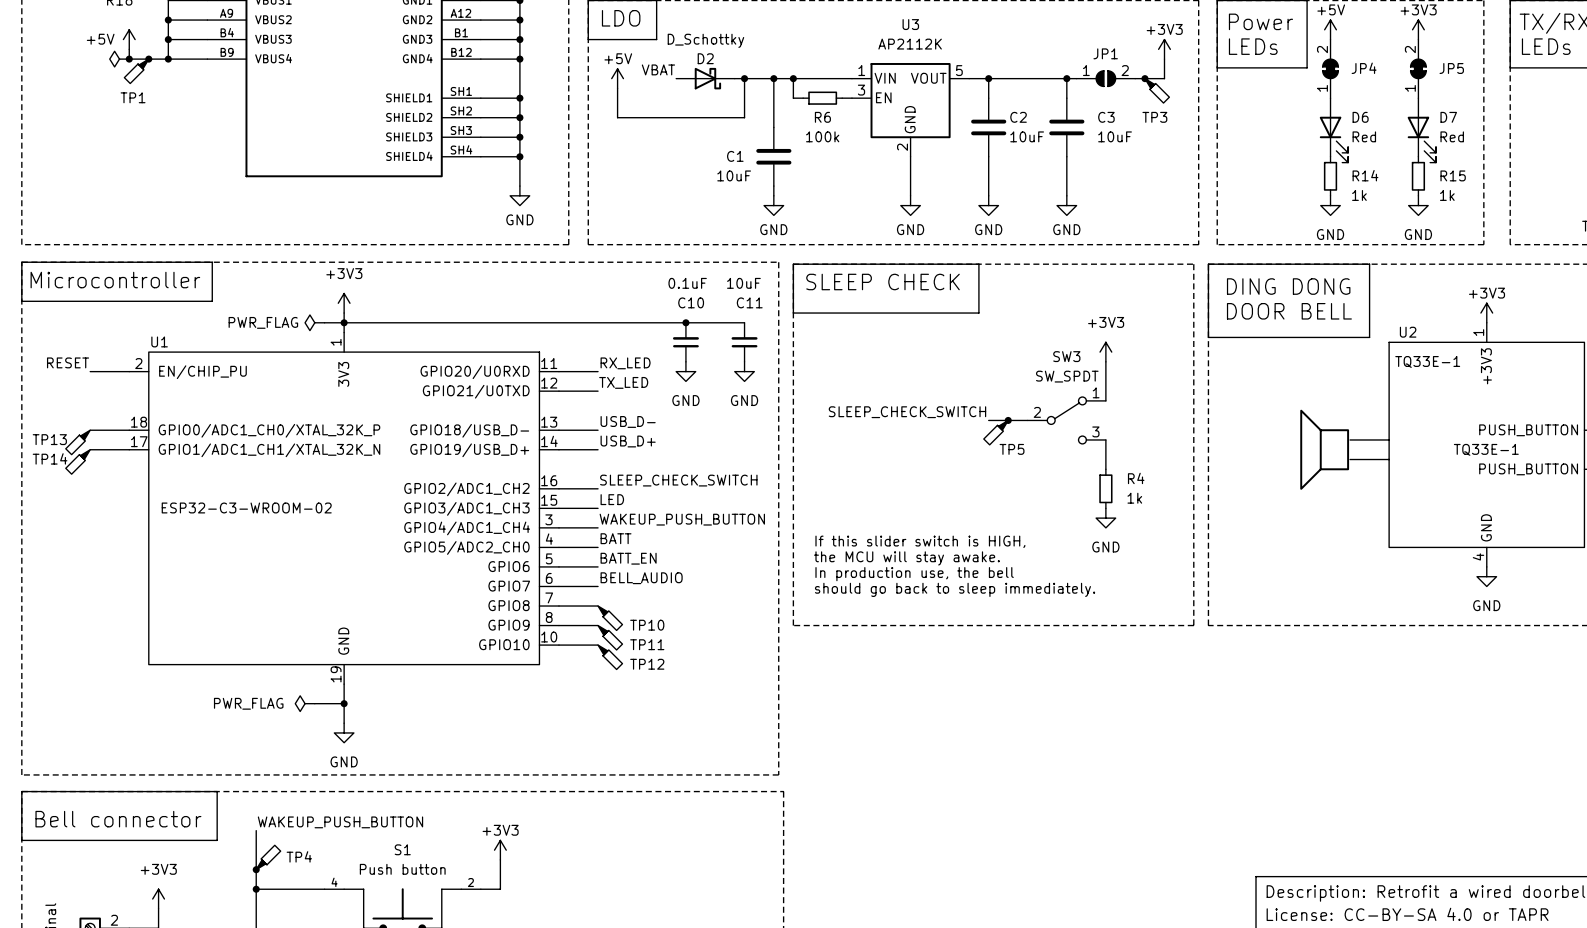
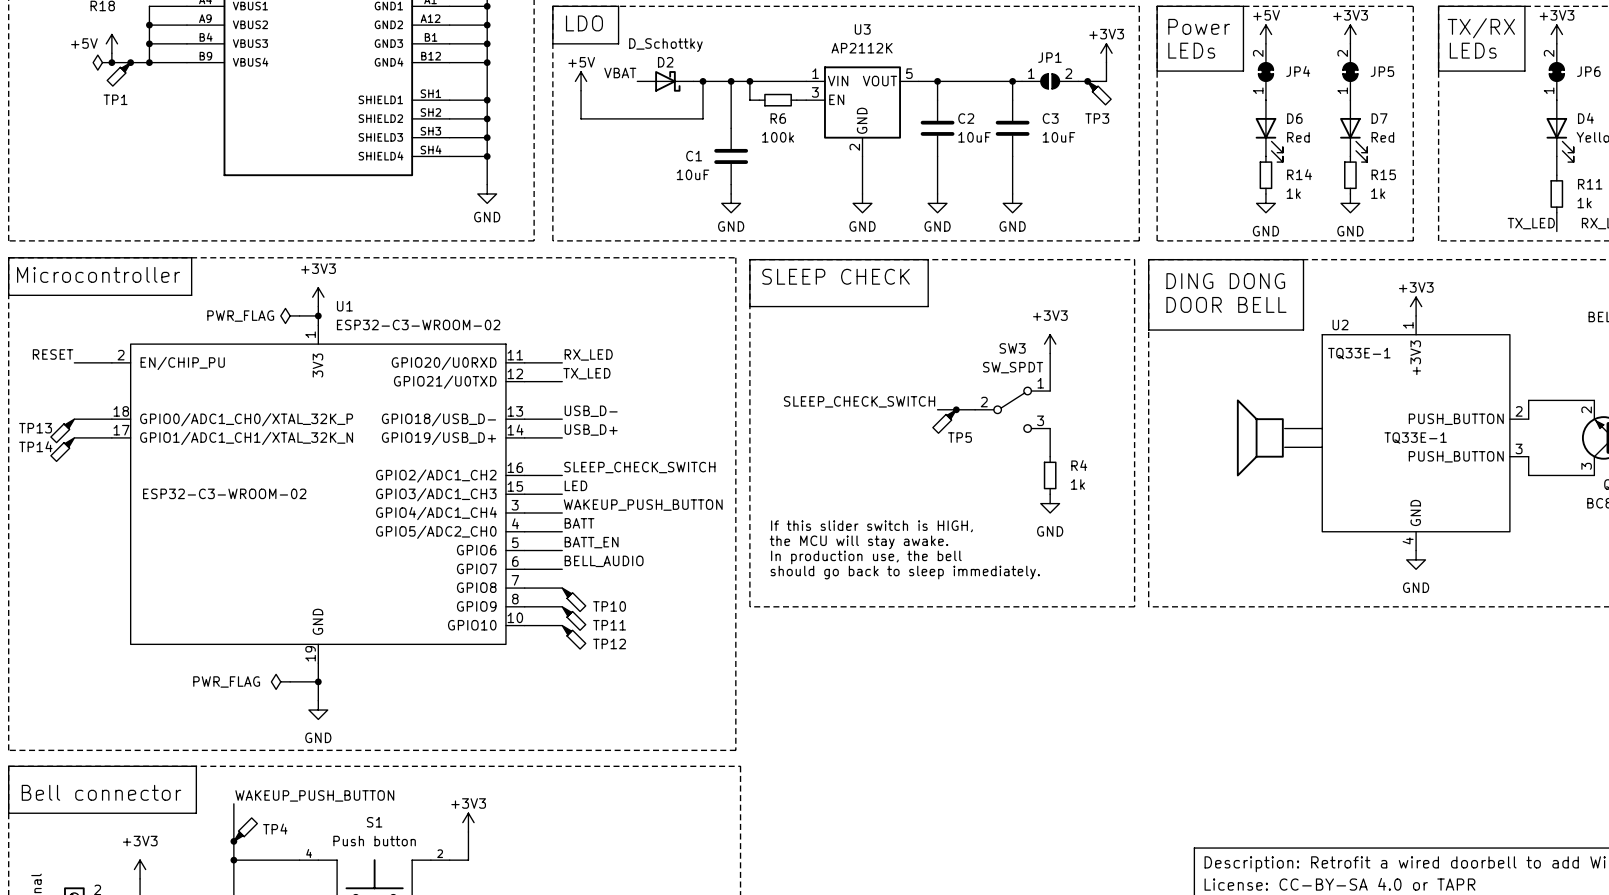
wire: (344, 322) (744, 322) -> none
junction: (685, 322) -> none
U1 value: none -> ESP32-C3-WROOM-02 (418, 324)
U1 name position: U1 (159, 341) -> U1 (344, 306)
C10: 0.1uF (685, 342) -> none
C11: 10uF (744, 342) -> none
power symbol: GND (685, 371) -> none
power symbol: GND (744, 371) -> none

